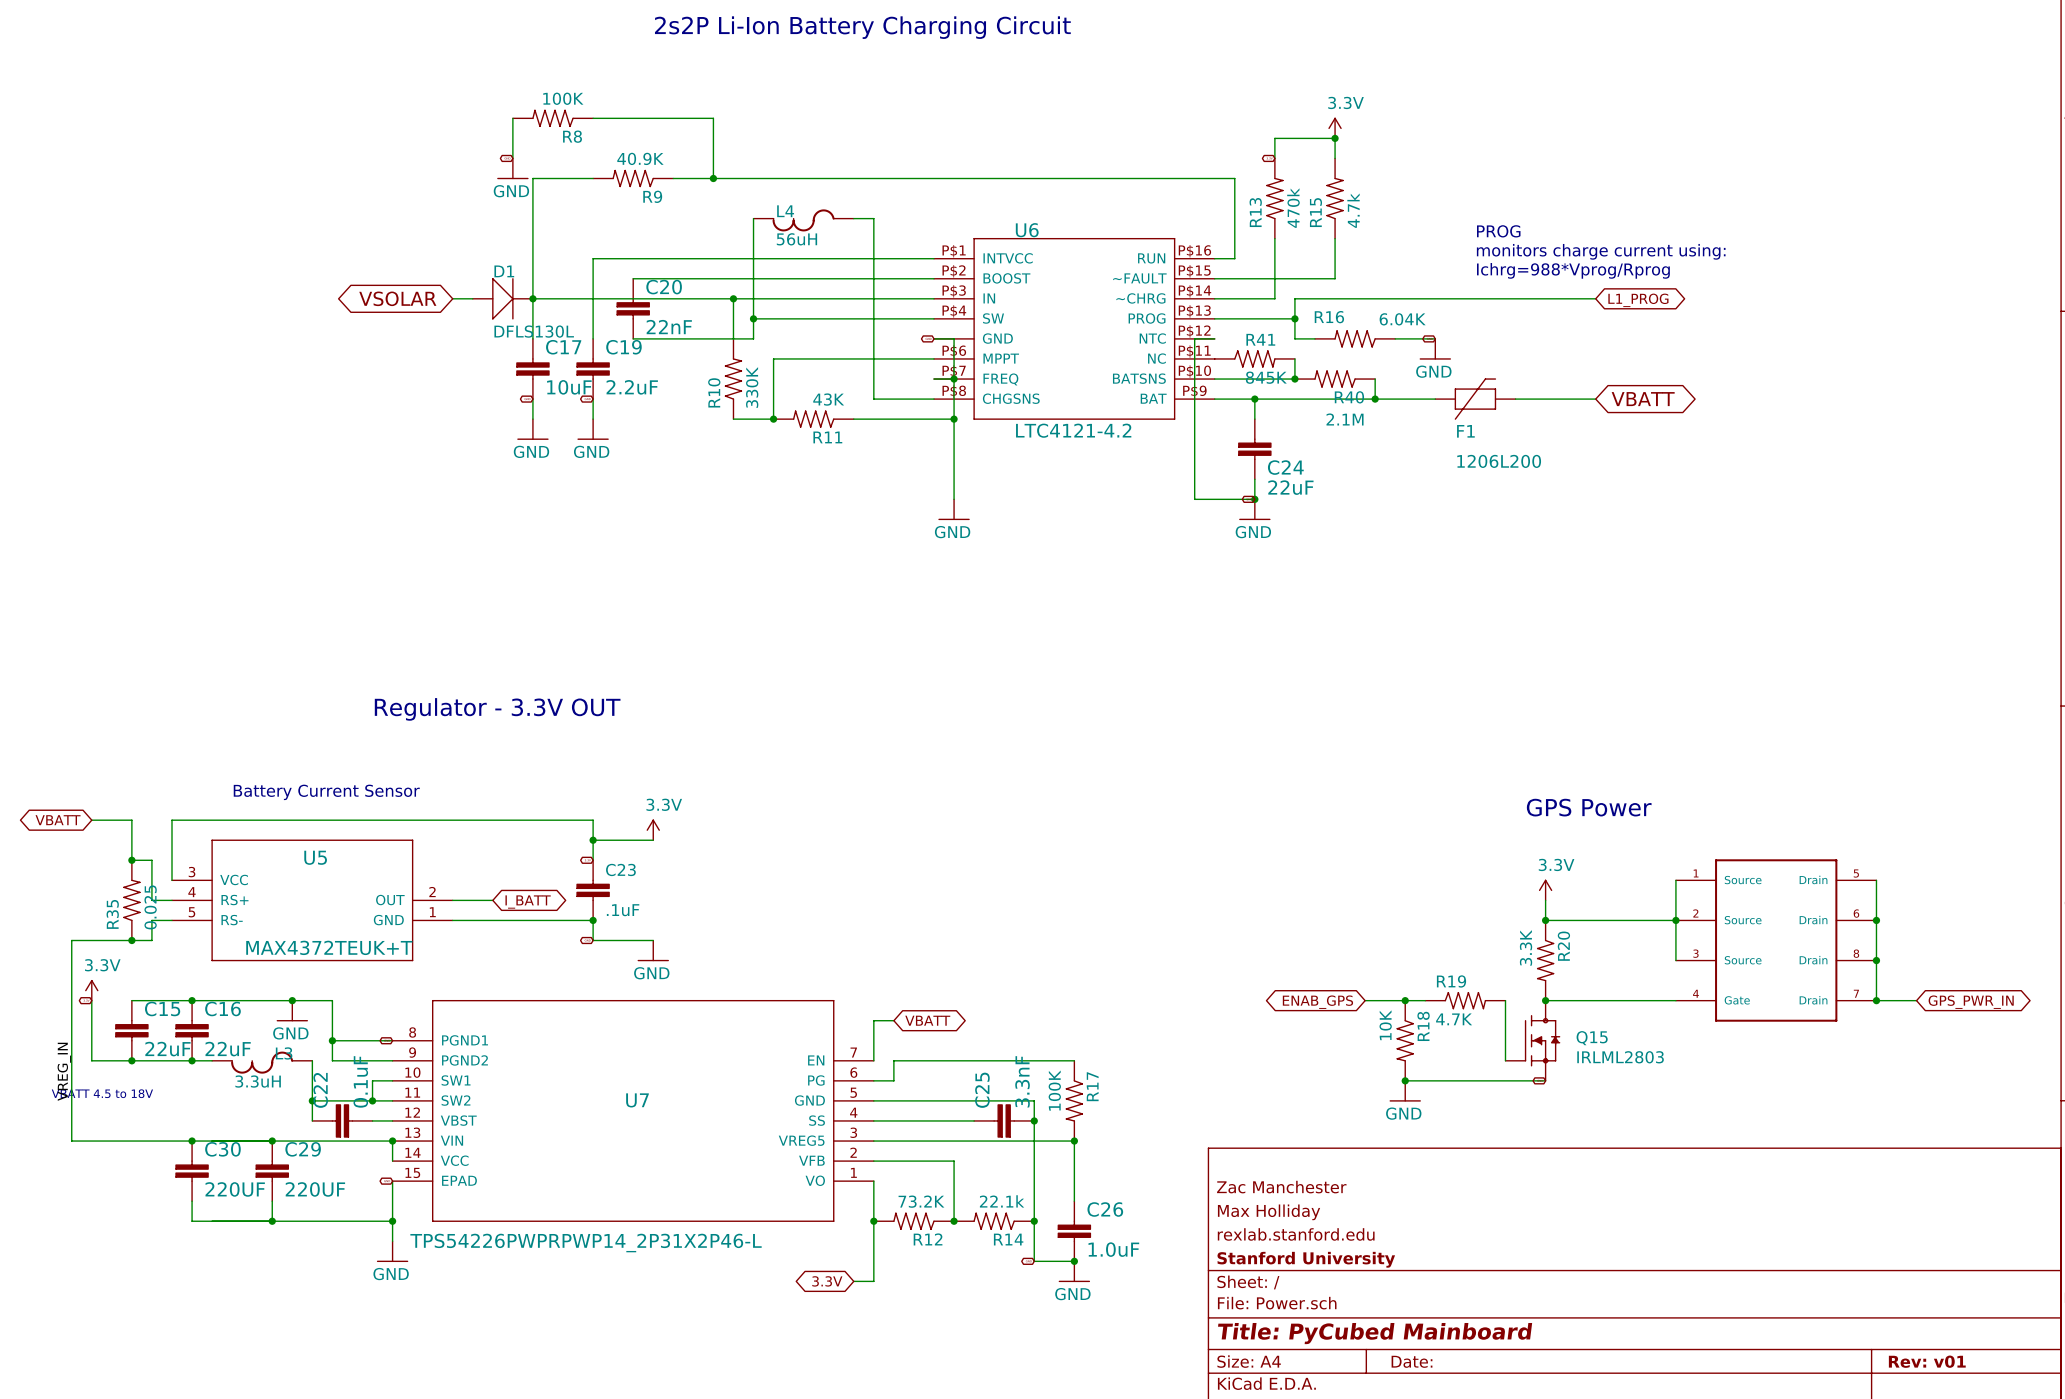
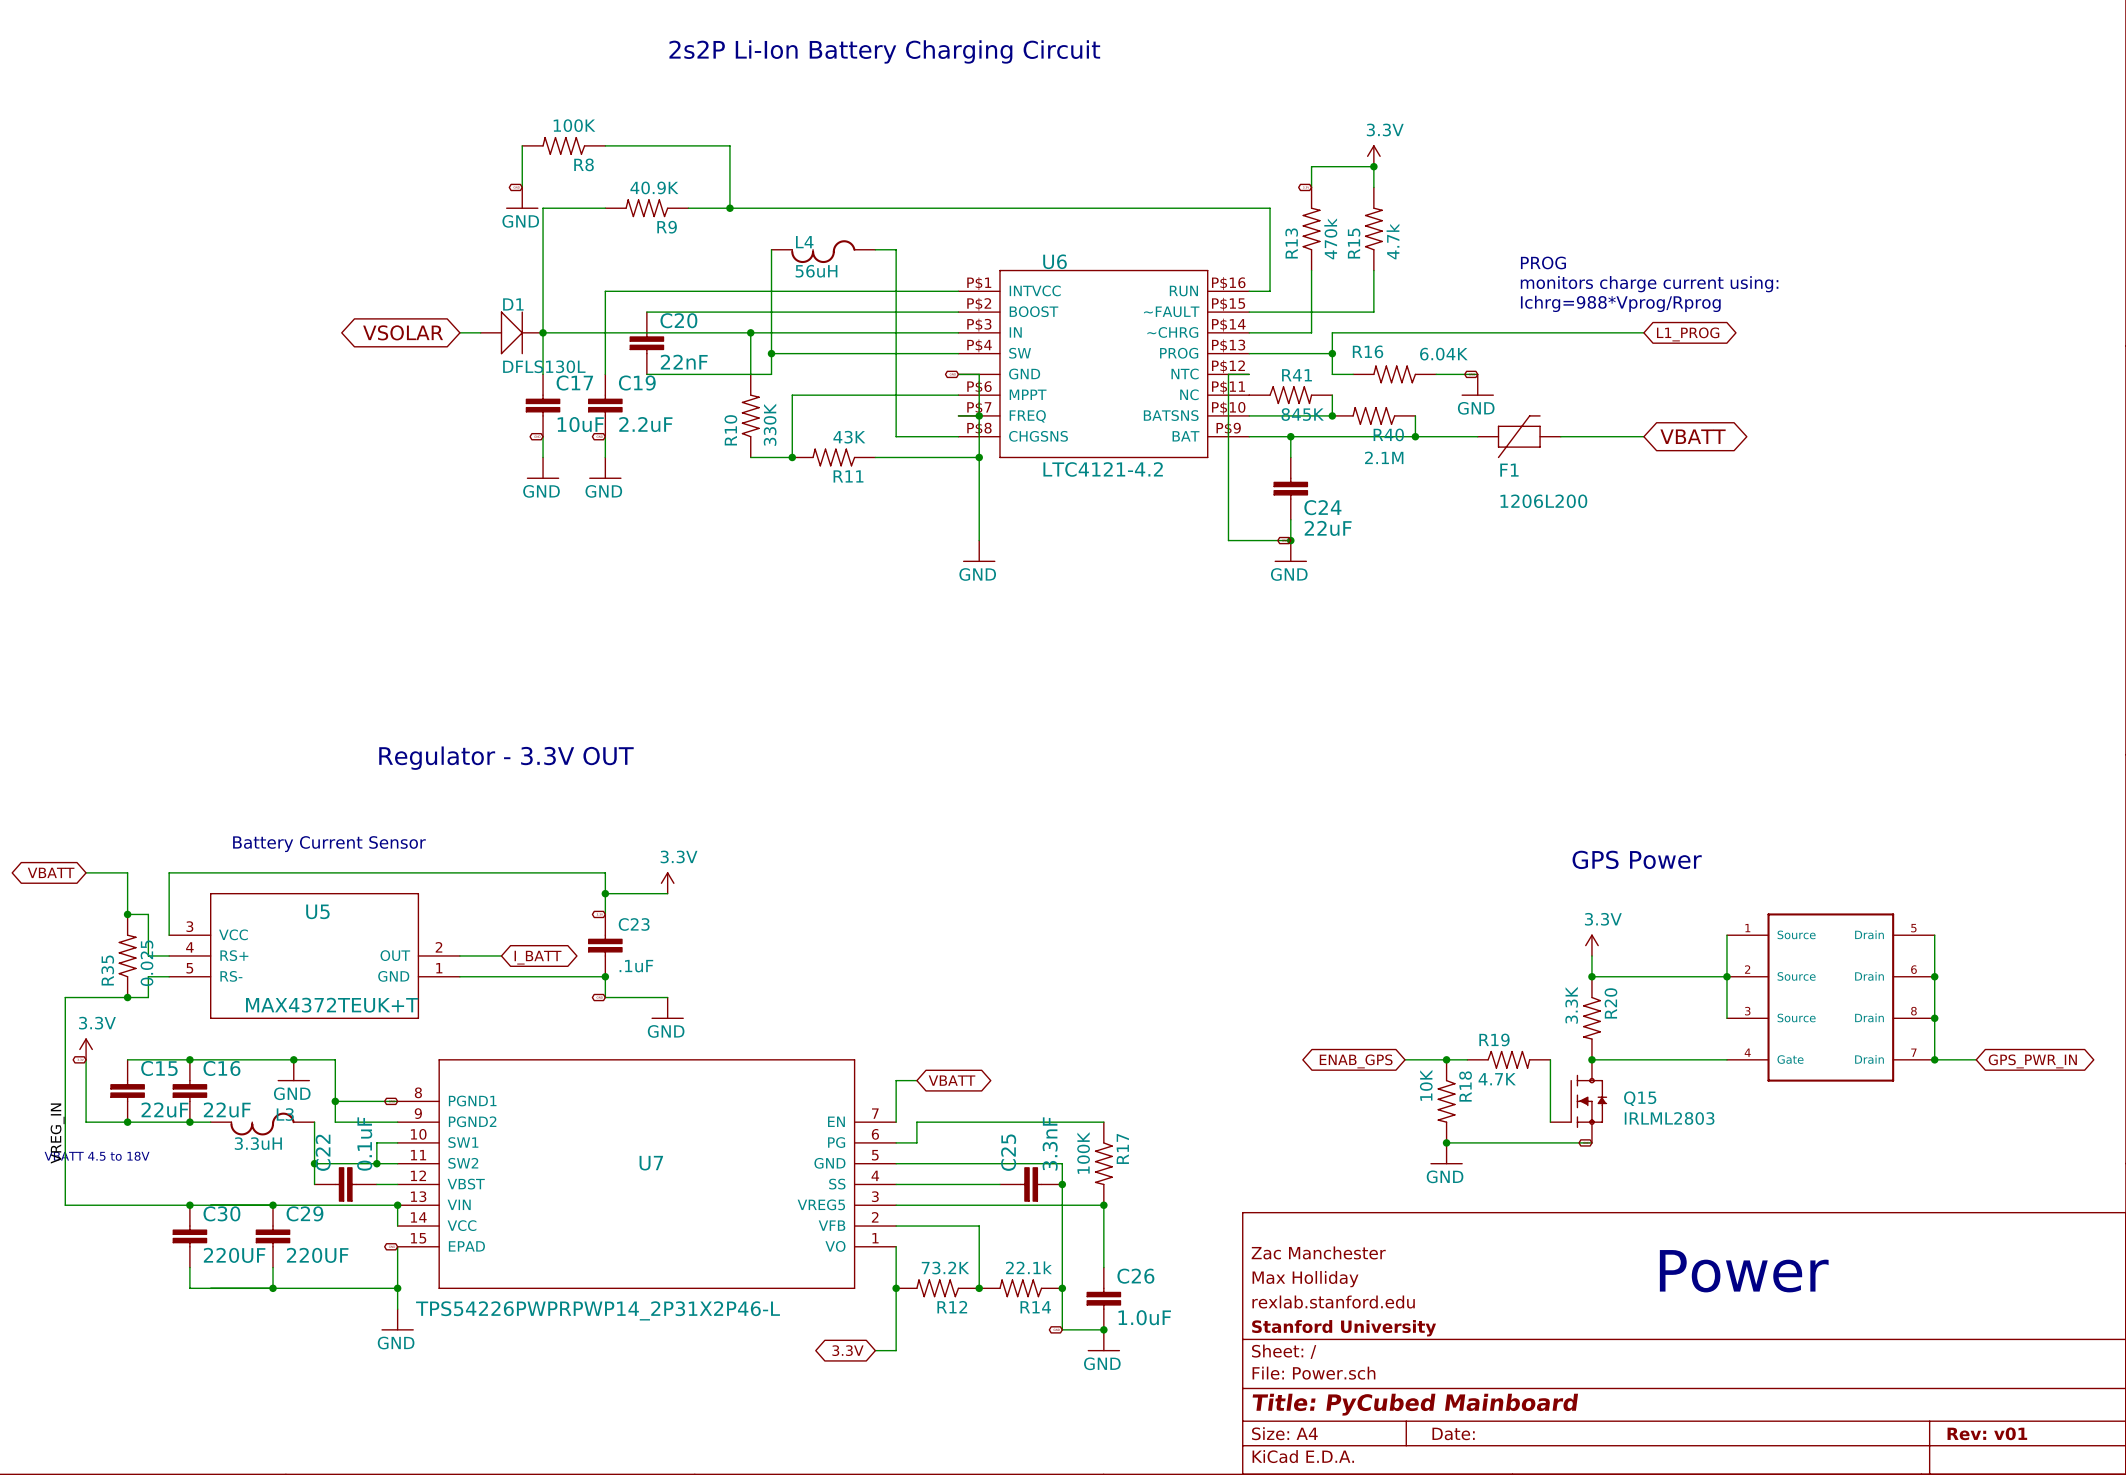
text: none -> Power (1744, 1271)

